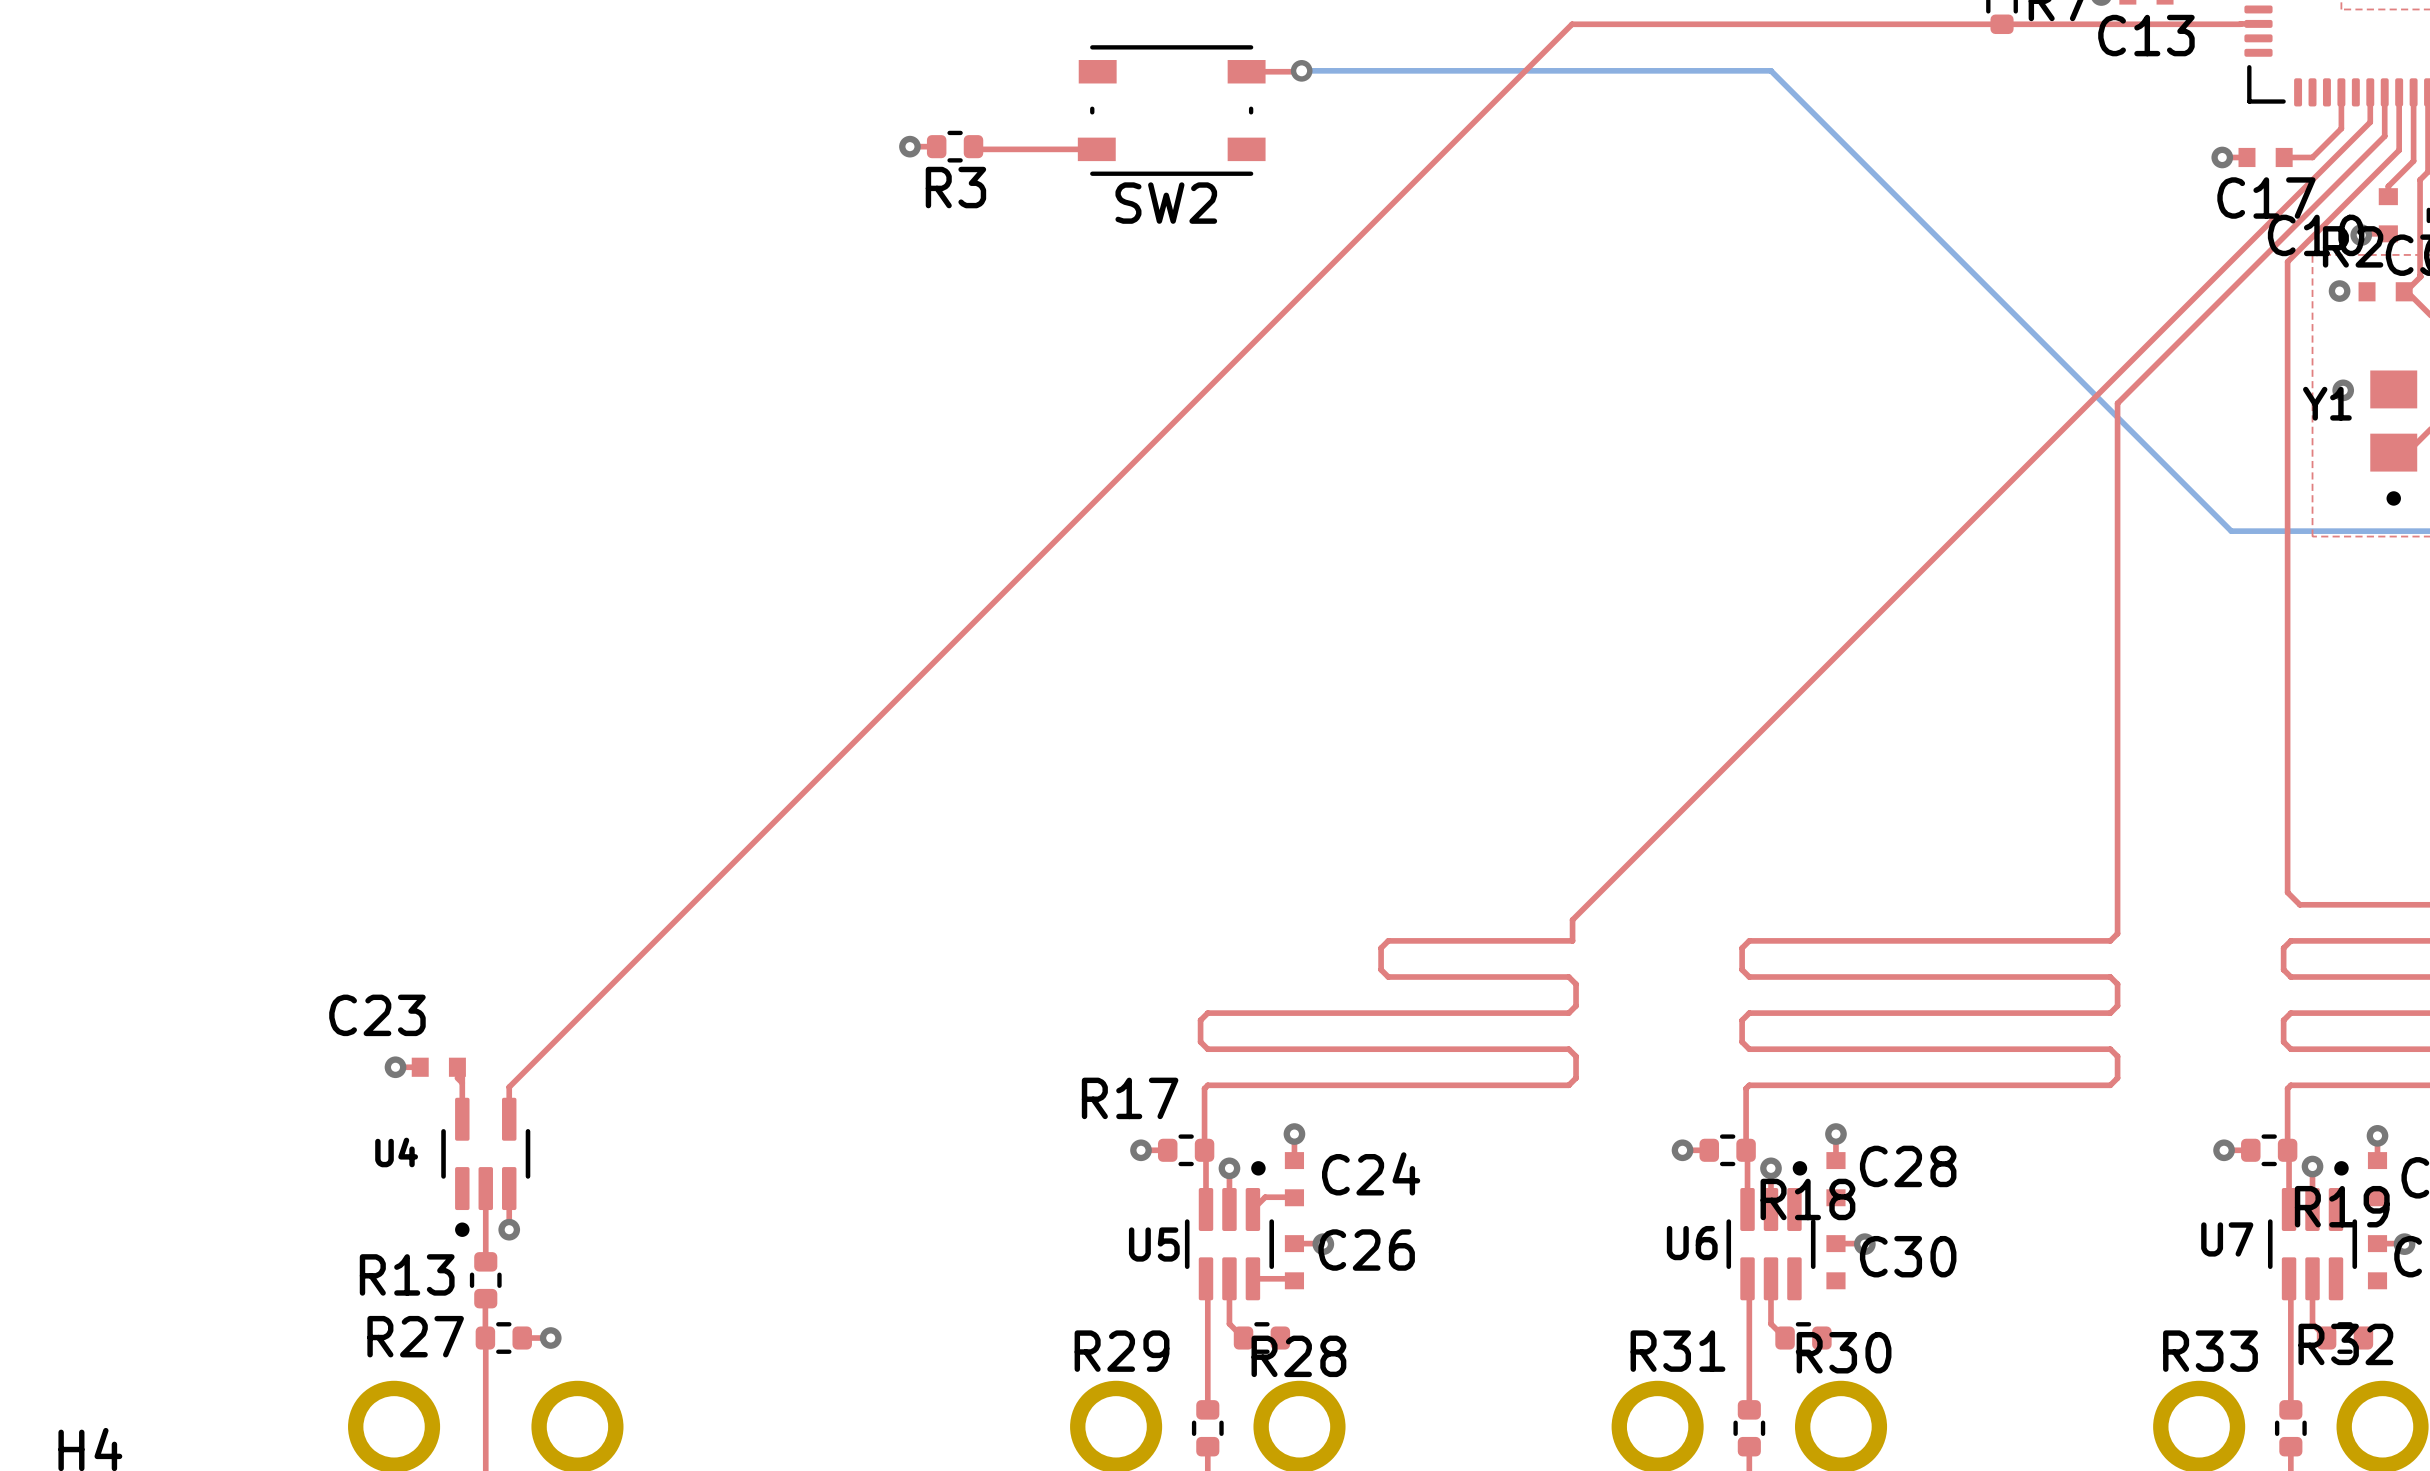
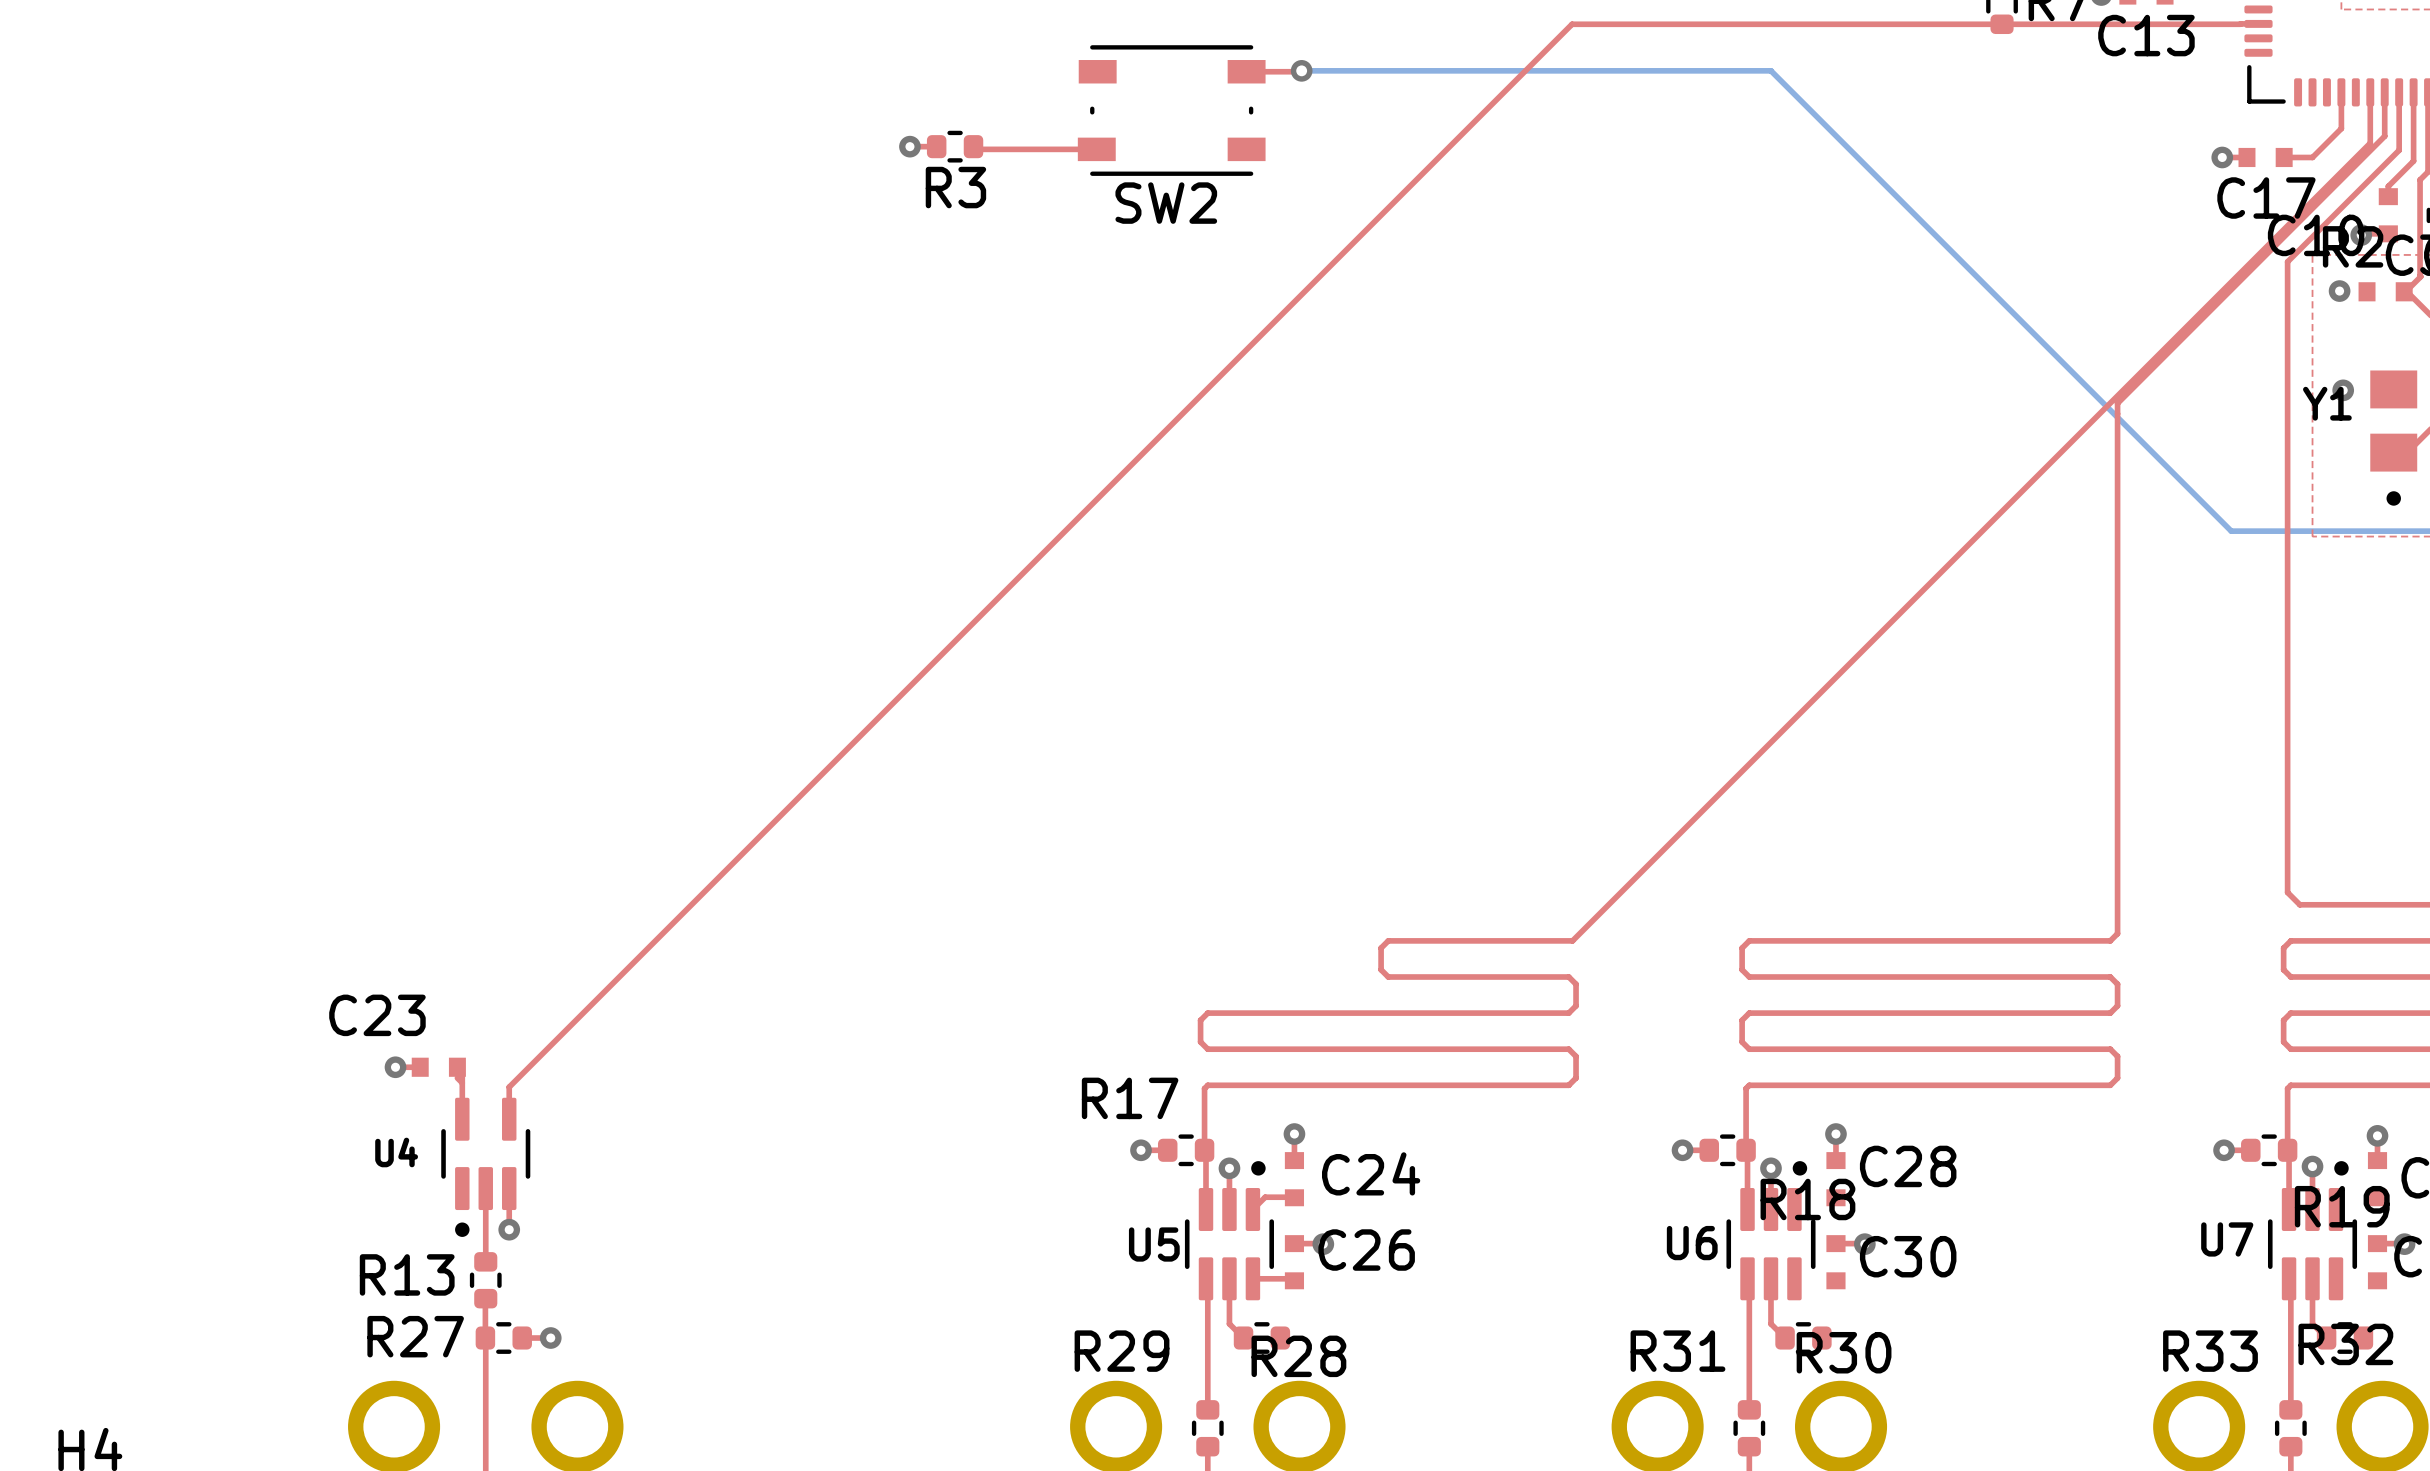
top track: (2370, 122) (1572, 919) (1572, 940) -> (2370, 122) (2370, 143) (1572, 940)

